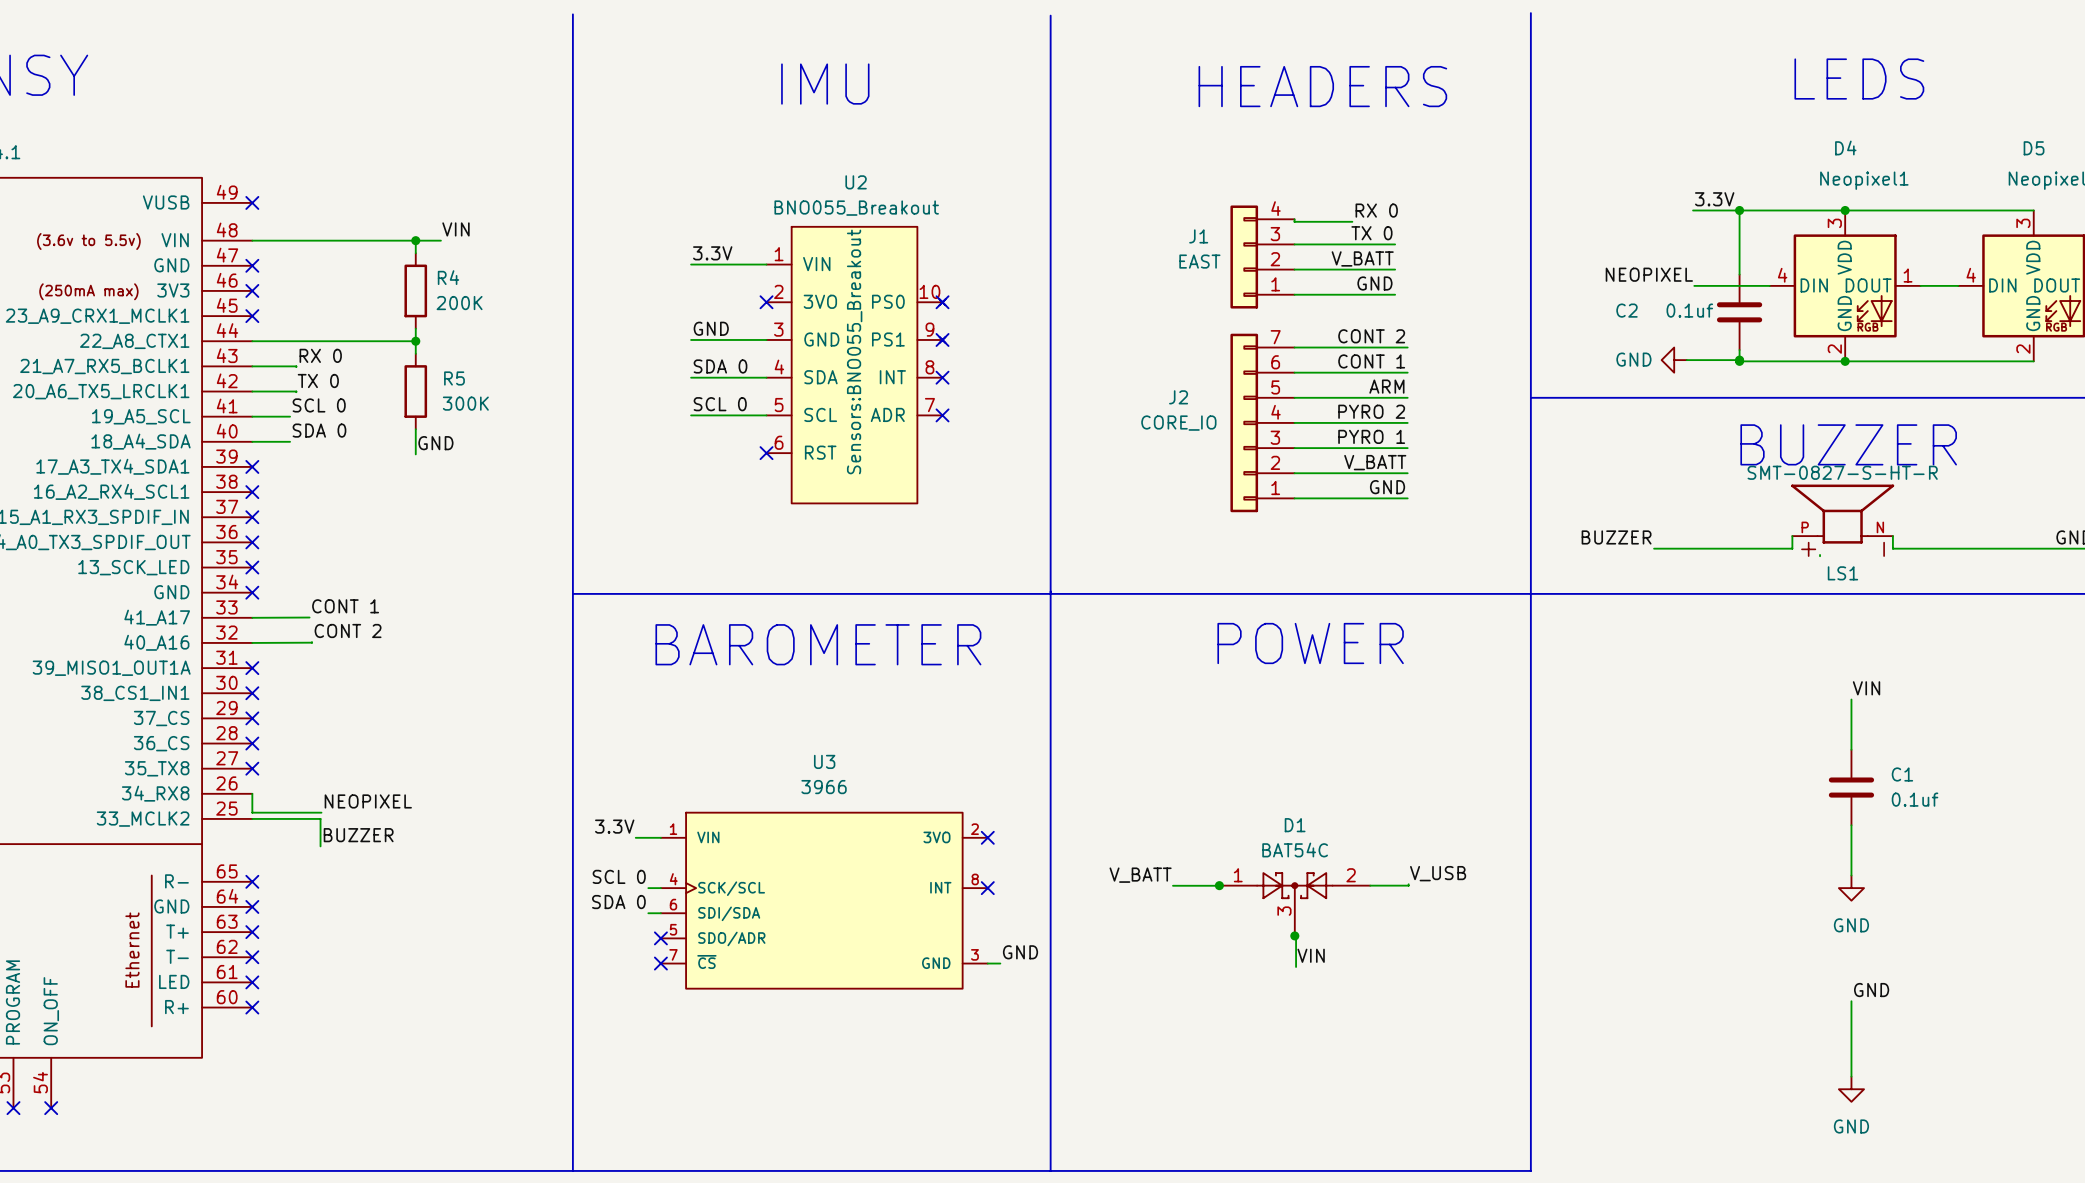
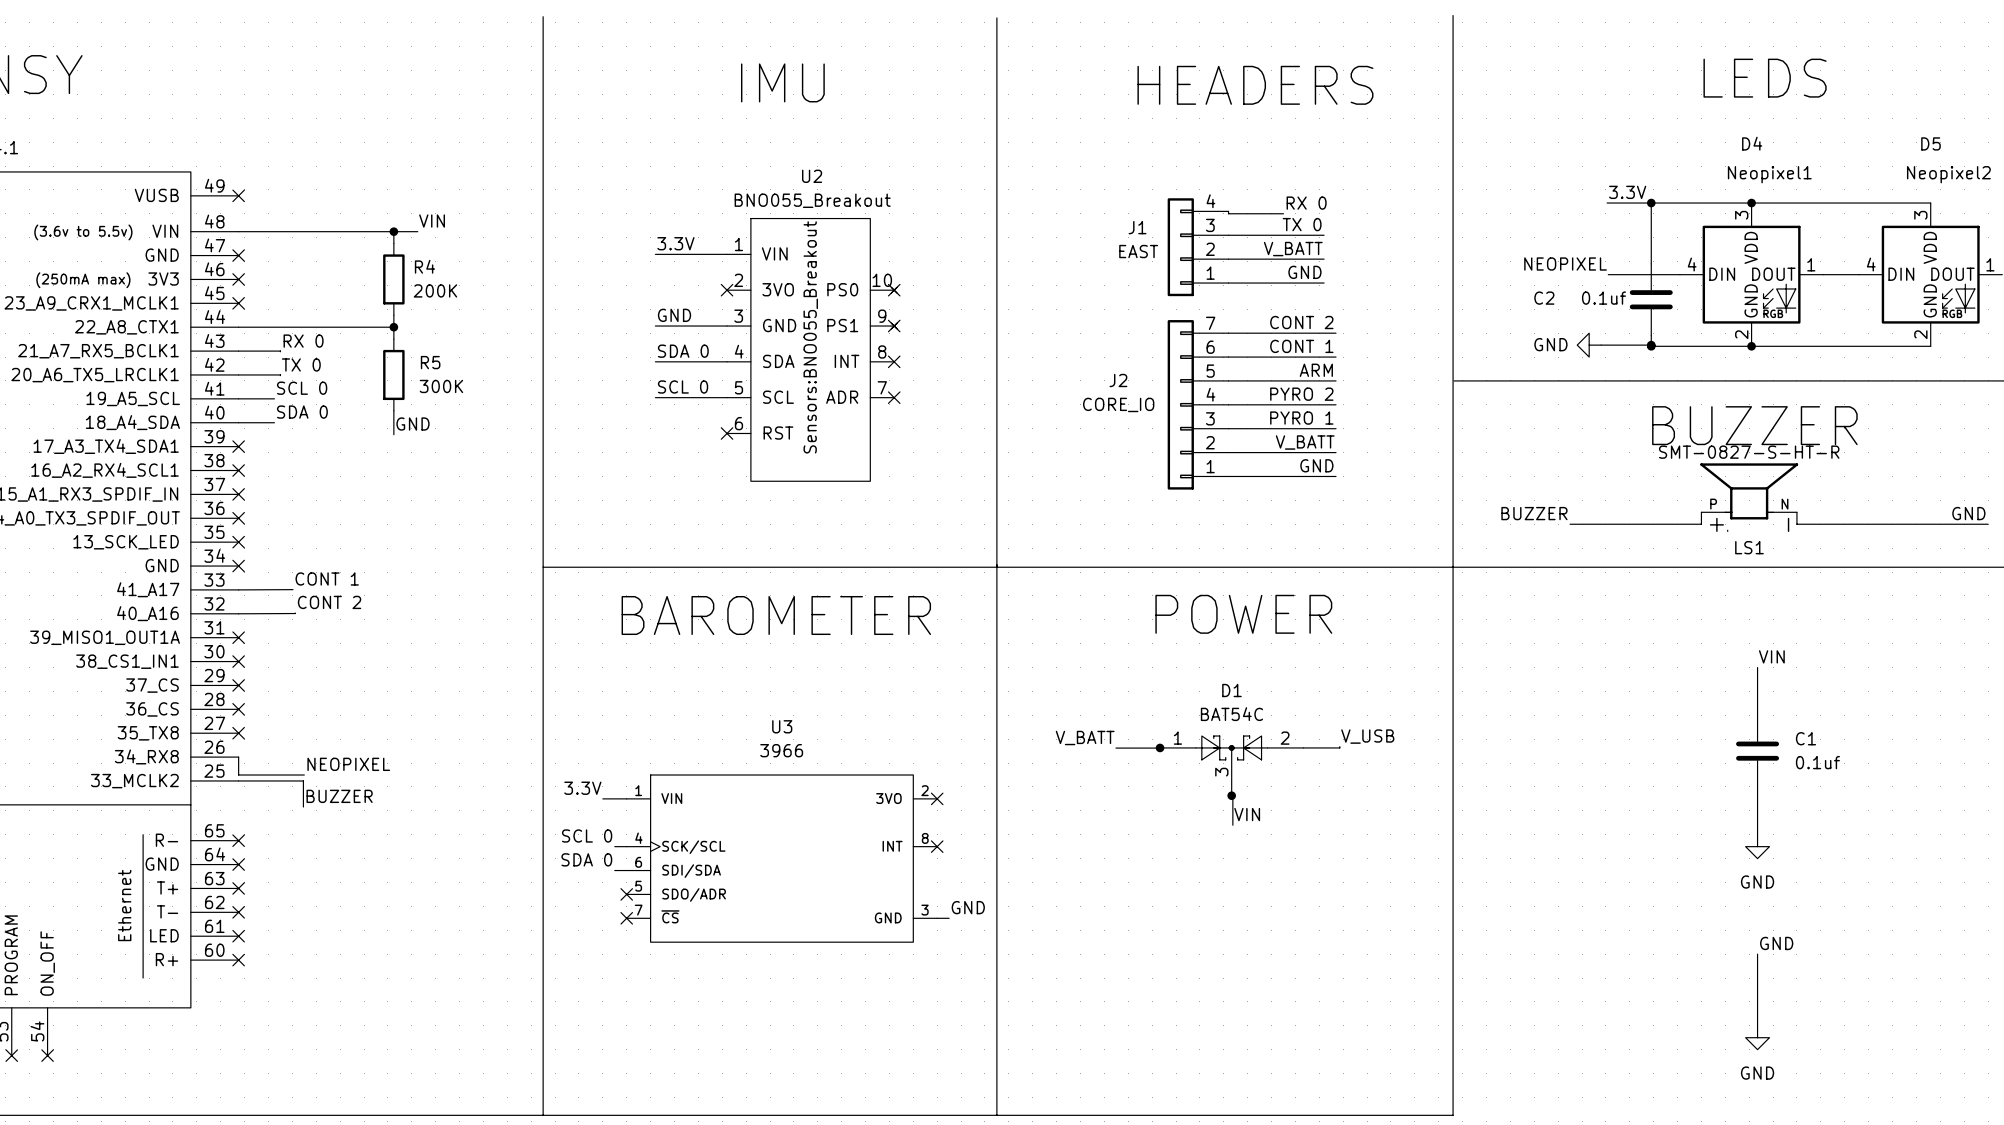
junction: none -> (1160, 747)
junction: none -> (1231, 795)
label position: V_USB (1438, 873) -> V_USB (1367, 736)
label position: V_BATT (1140, 875) -> V_BATT (1085, 737)
wire: (1408, 884) (1370, 885) -> (1339, 746) (1303, 747)
wire: (1172, 885) (1219, 885) -> (1115, 748) (1160, 748)
junction: (1219, 885) -> none
D1 position: (1294, 904) -> (1231, 765)
wire: (1294, 935) (1296, 966) -> (1231, 795) (1232, 825)
junction: (1294, 935) -> none
label position: VIN (1311, 955) -> VIN (1247, 814)

